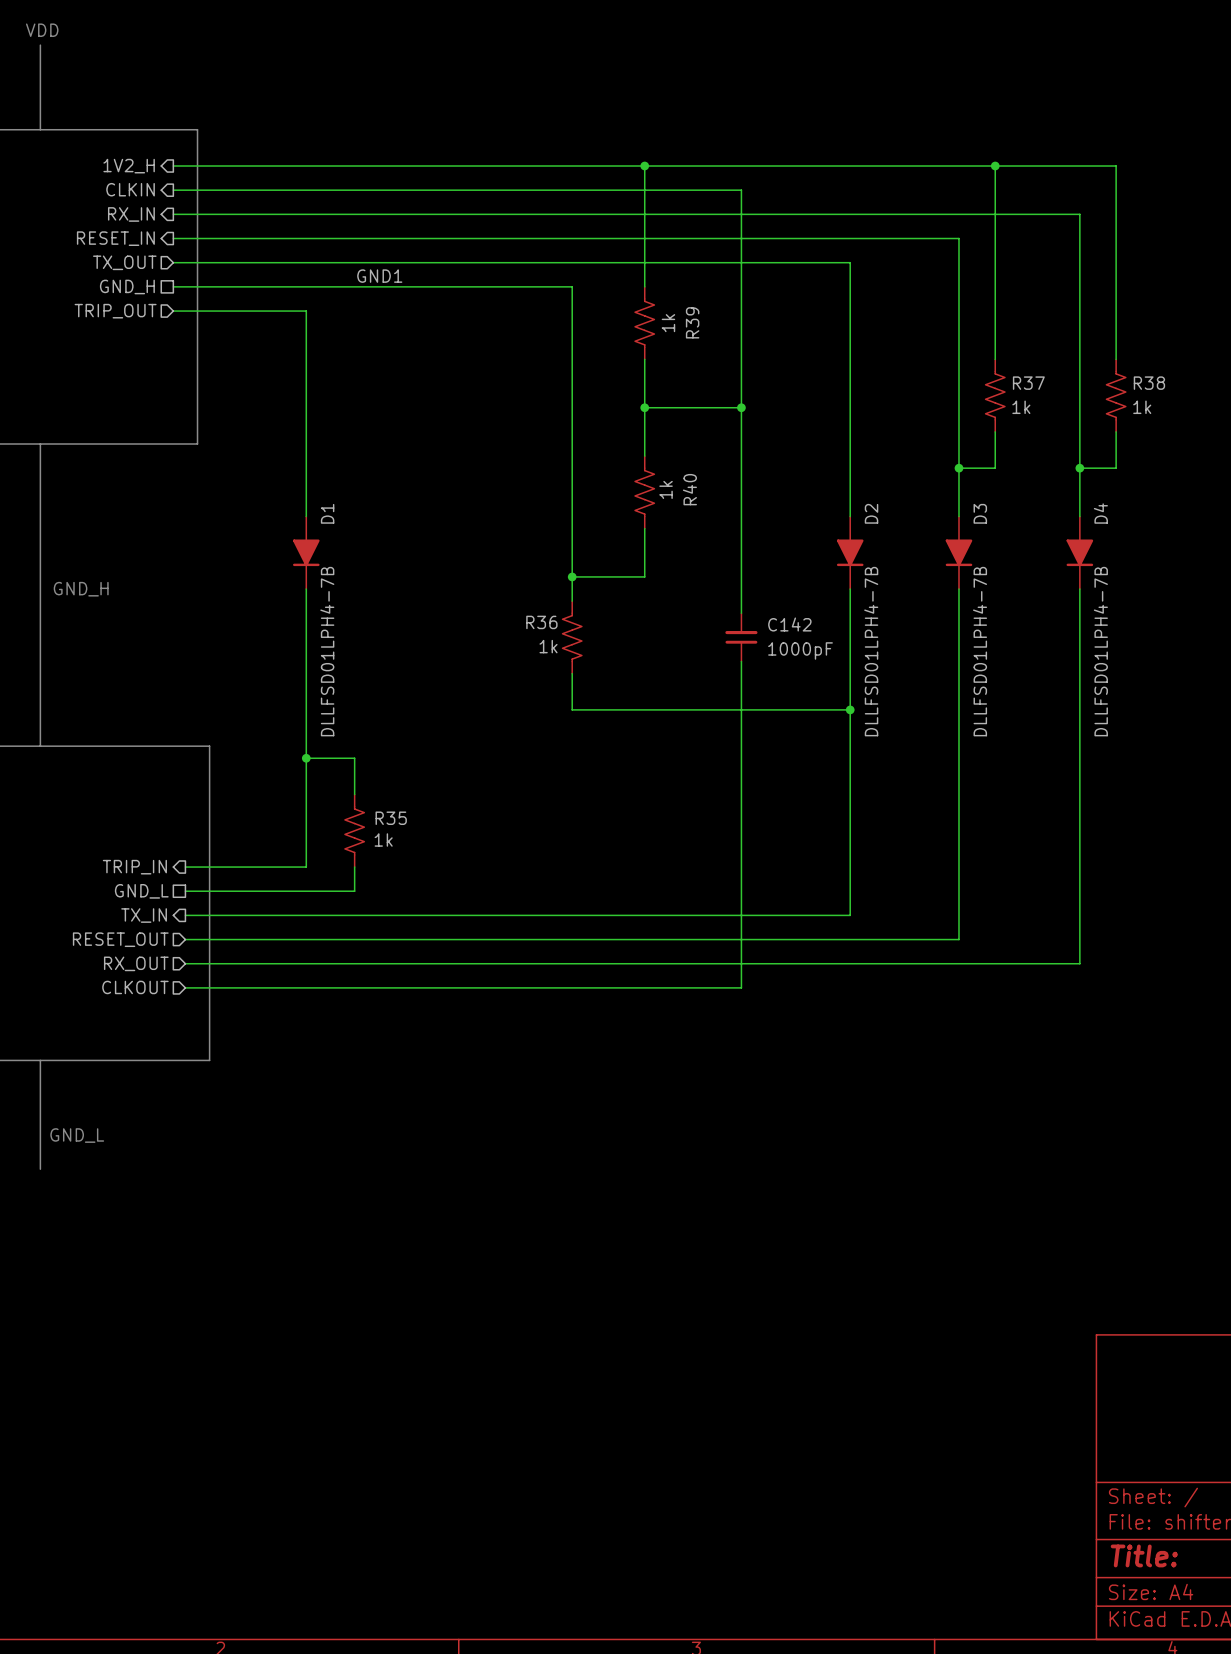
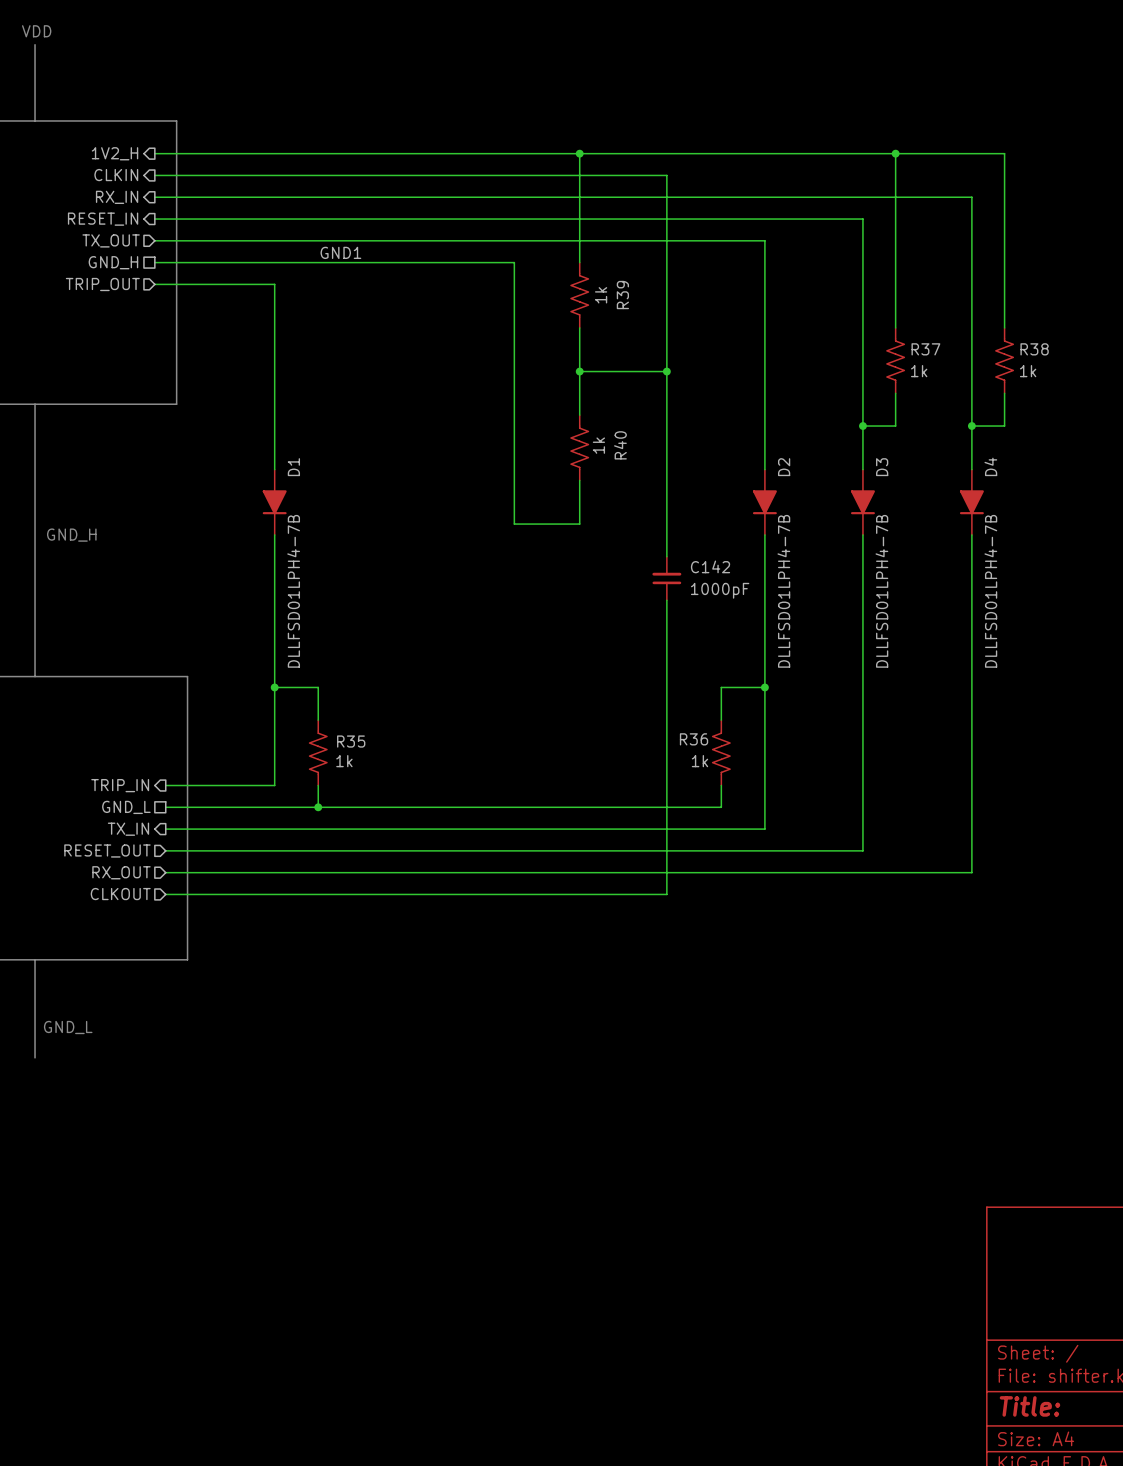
wire: (572, 576) (572, 601) -> none
junction: (572, 576) -> none
R36 position: (572, 637) -> (721, 752)
wire: (572, 673) (572, 709) (850, 709) -> none
junction position: (850, 709) -> (764, 687)
wire: none -> (764, 687) (721, 687) (721, 720)
wire: none -> (721, 785) (721, 807) (318, 807)
junction: none -> (318, 807)

